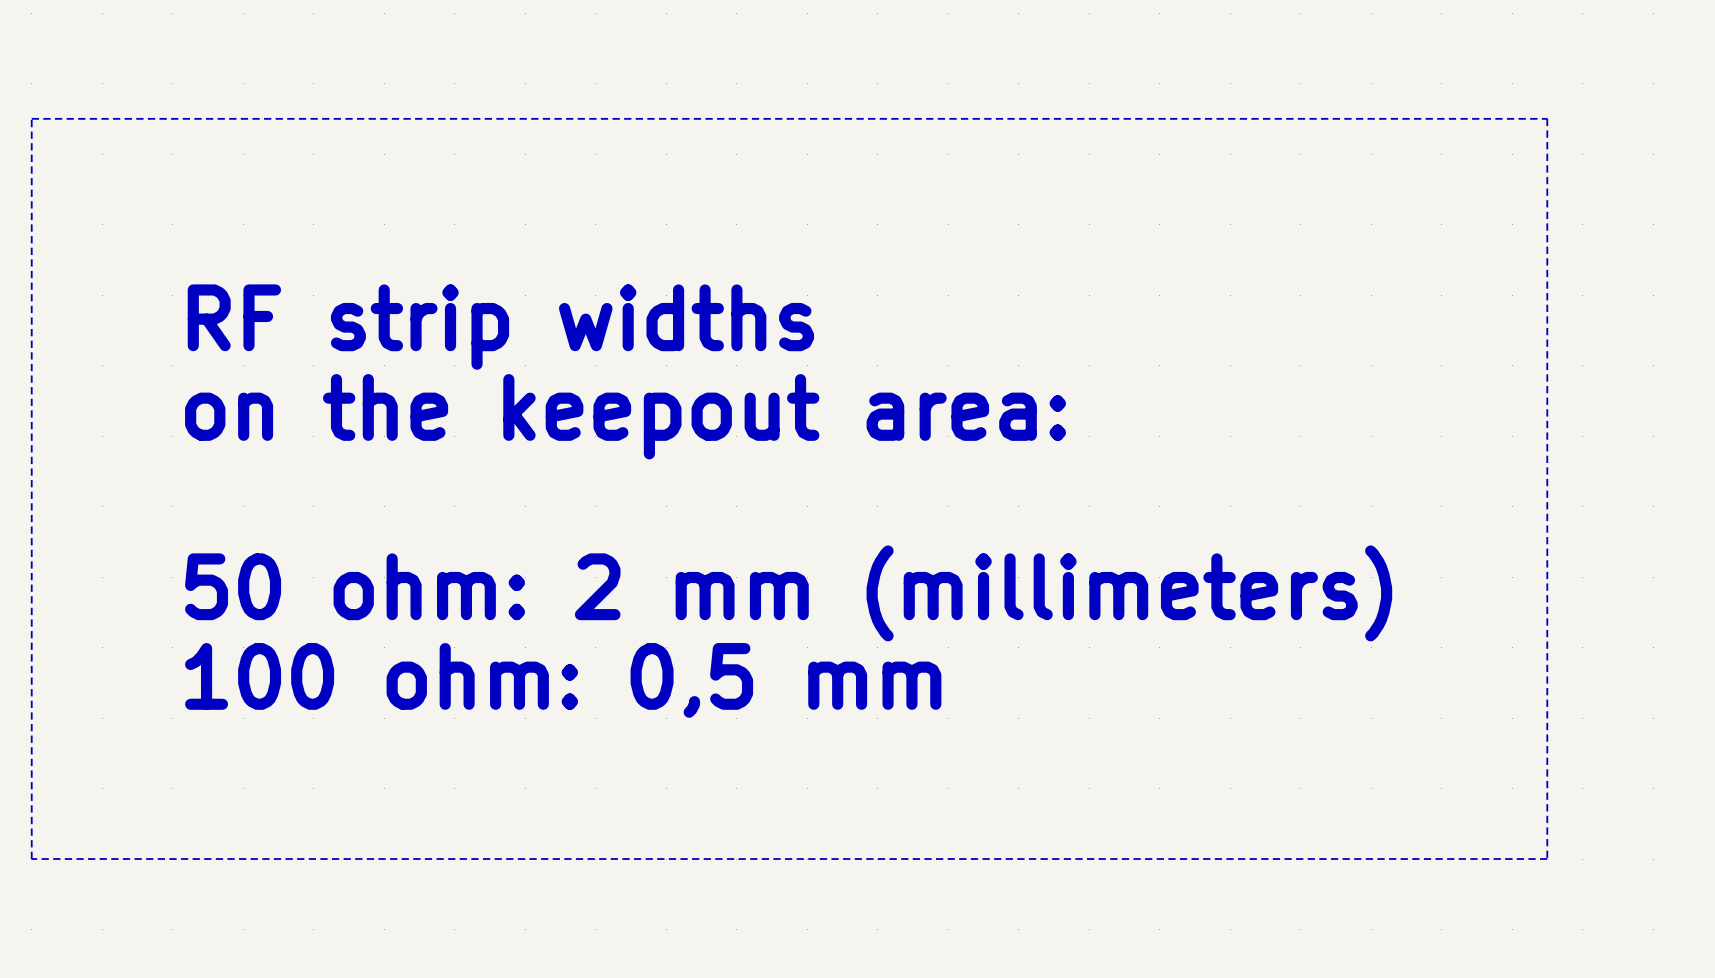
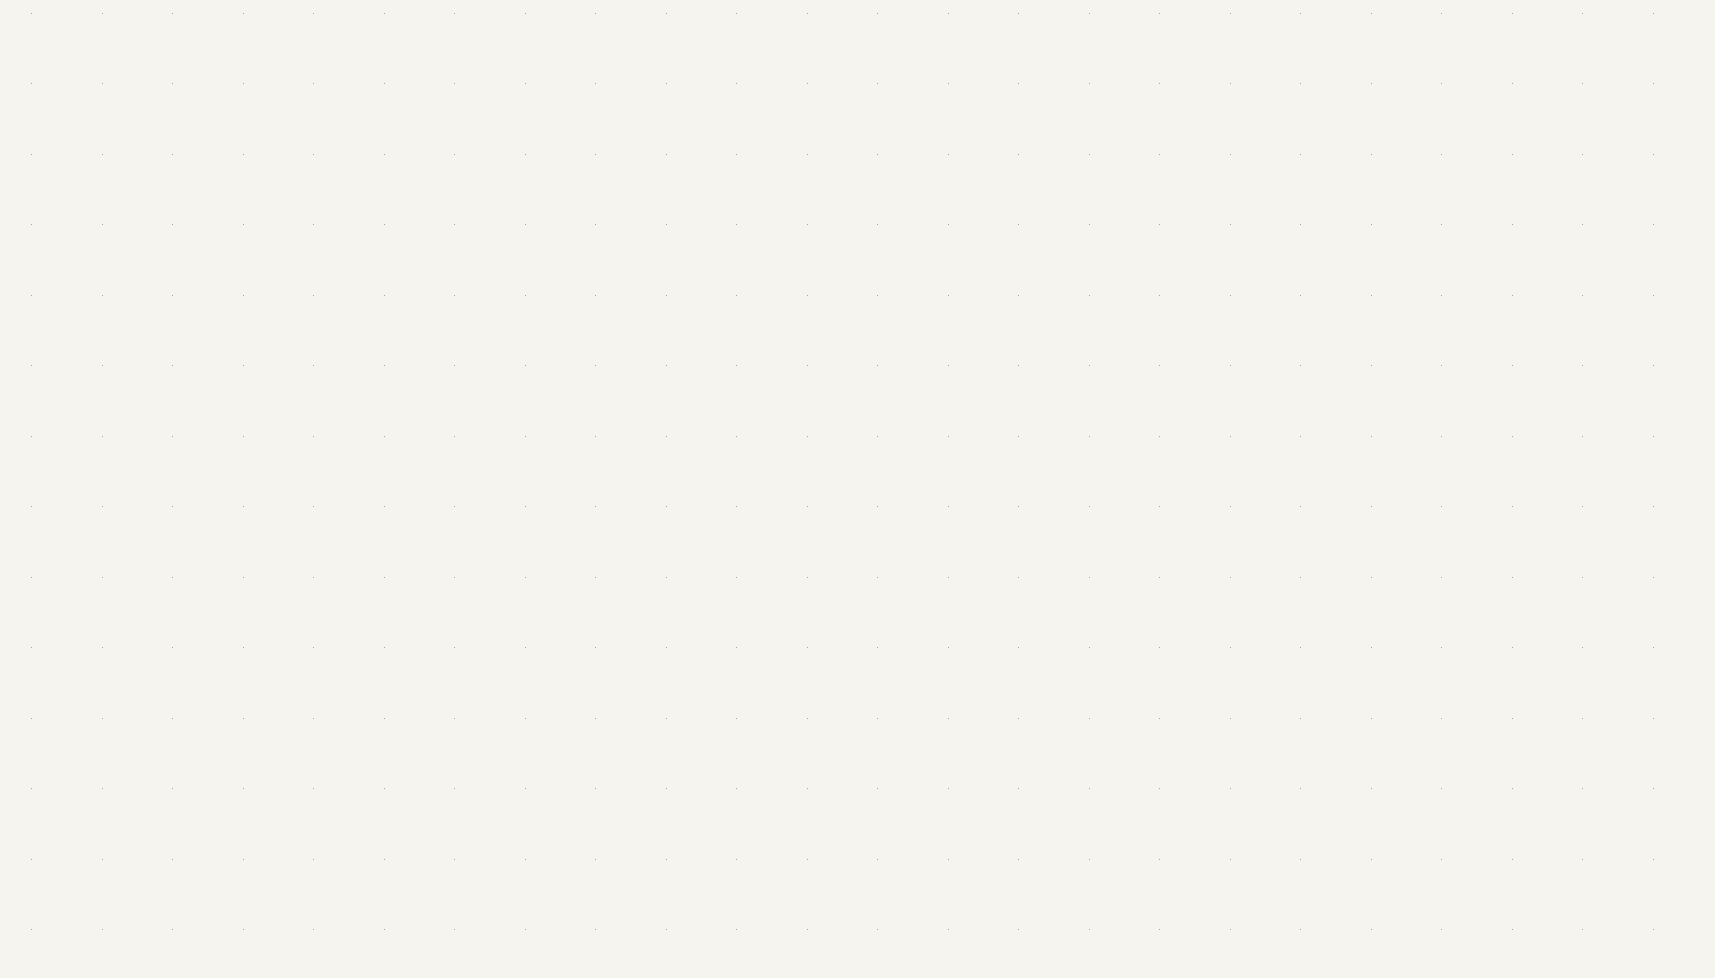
line: (31, 118) (1547, 118) (1547, 859) (31, 859) (31, 118) -> none
text: RF strip widths (500, 327) -> none
text: on the keepout area: (625, 416) -> none
text: 50 ohm: 2 mm (millimeters) (788, 593) -> none
text: 100 ohm: 0,5 mm (563, 680) -> none

